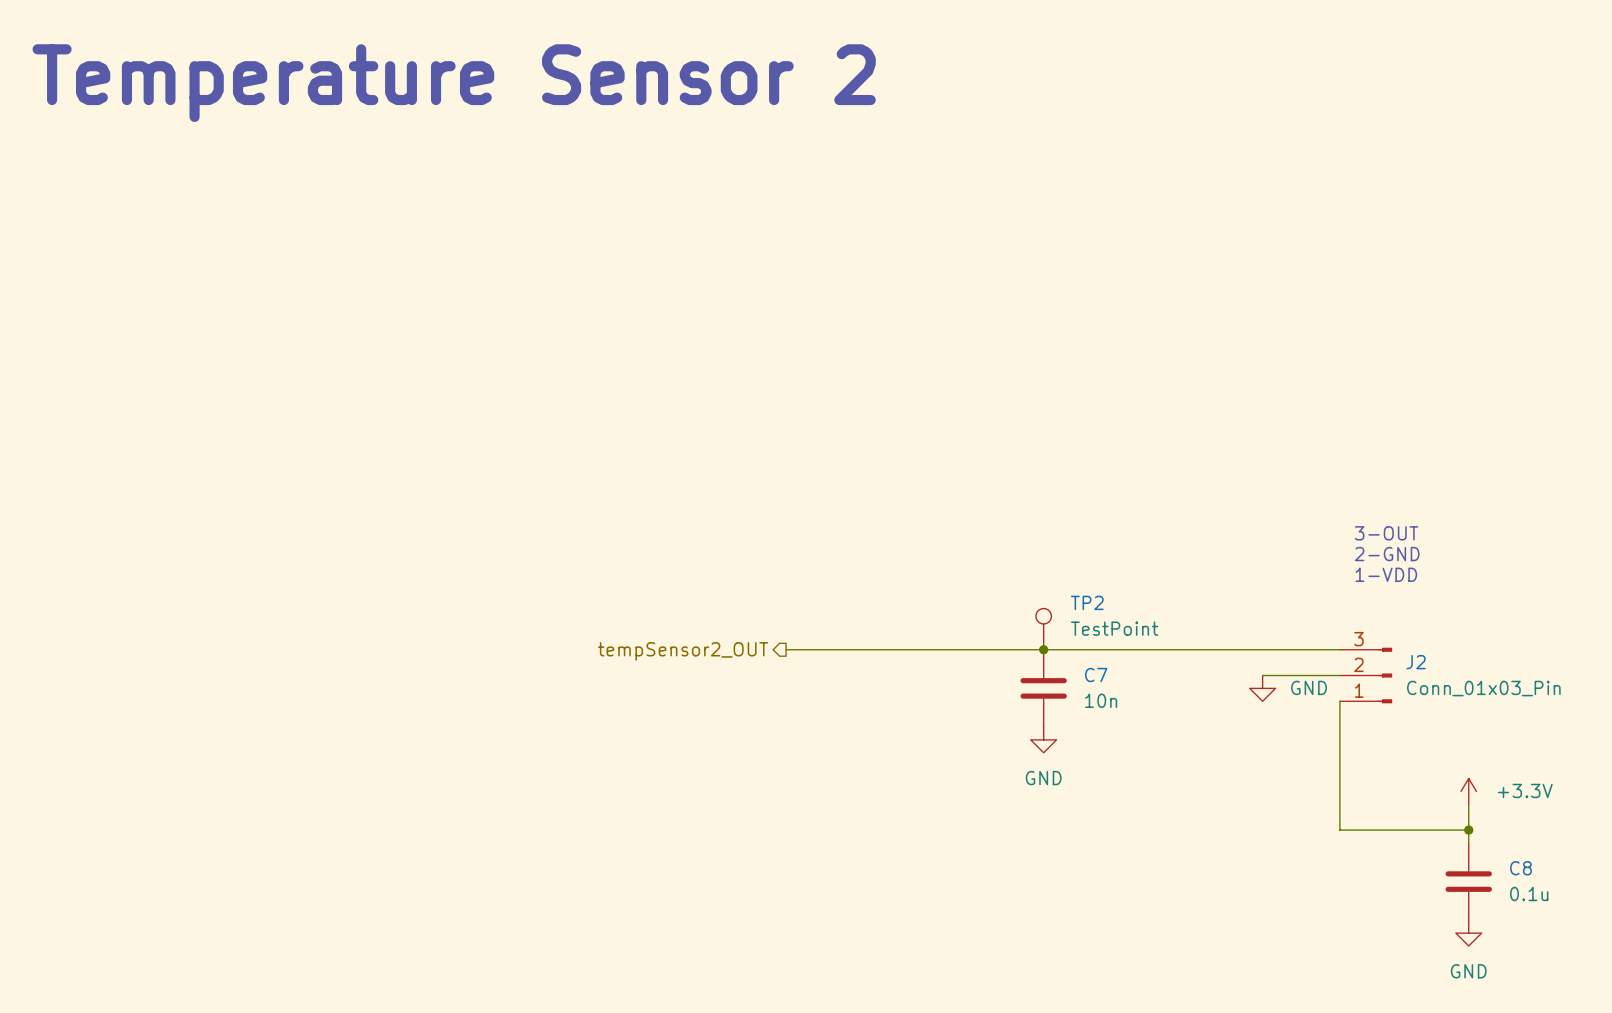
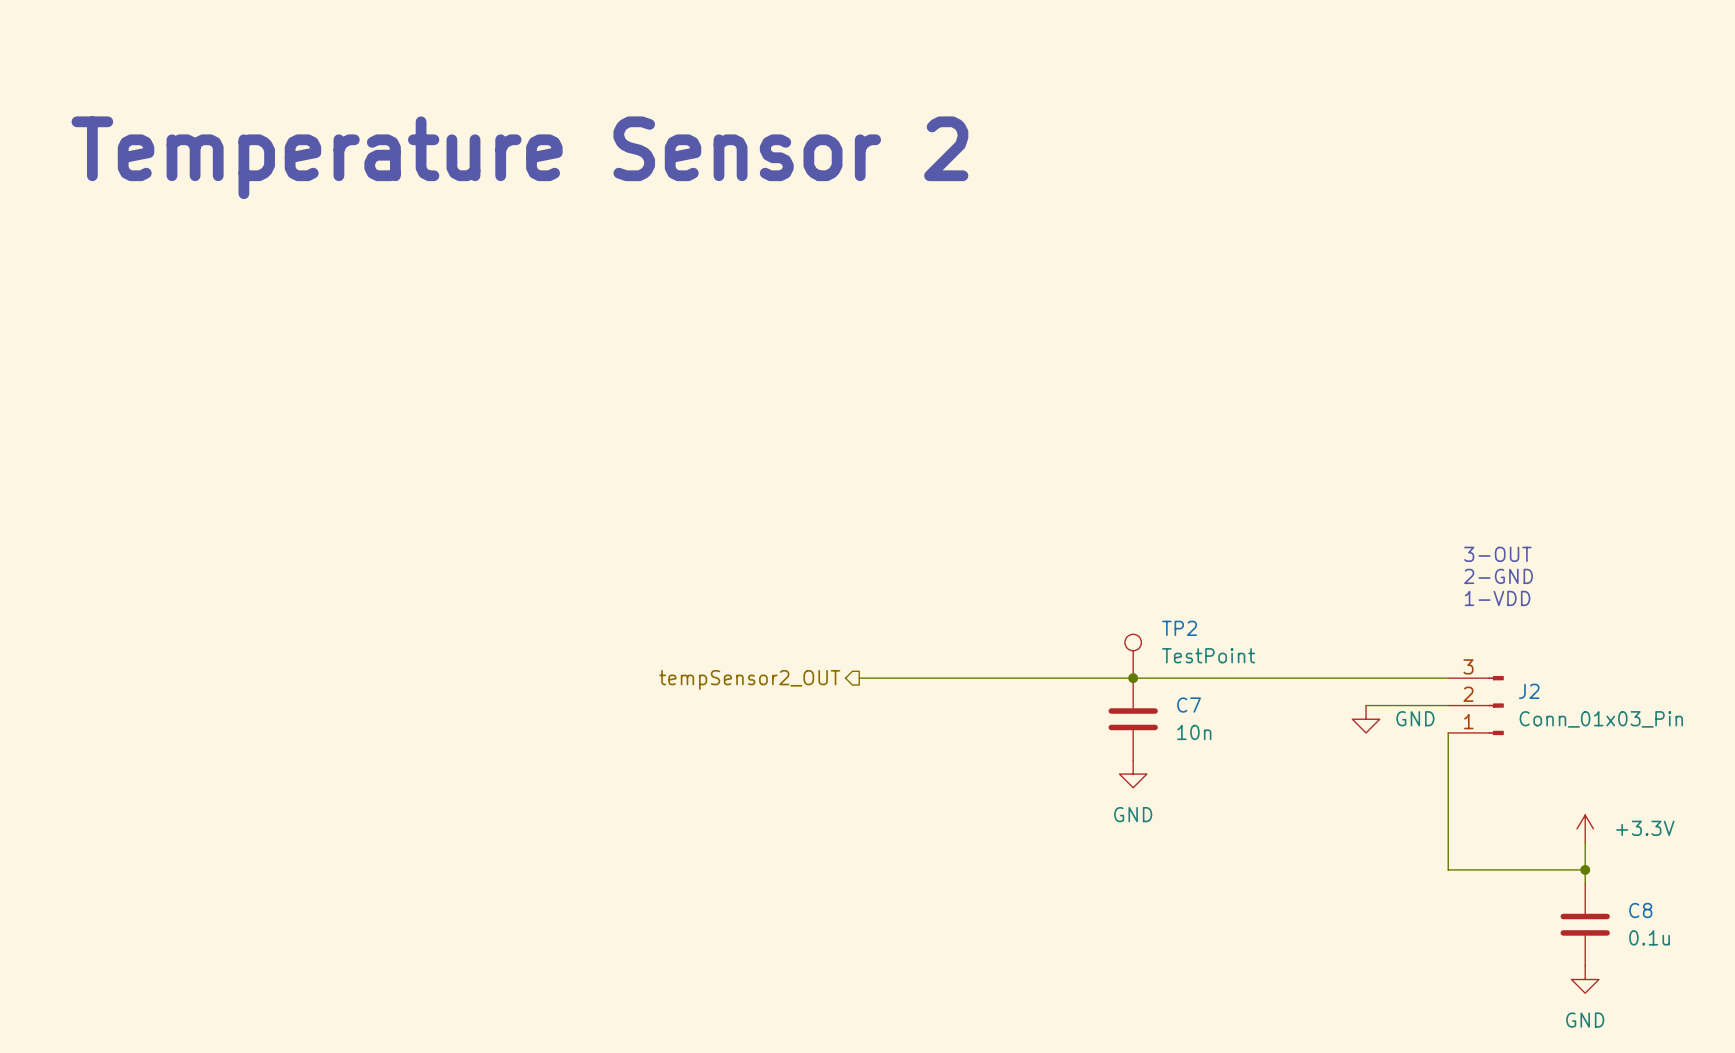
text position: Temperature Sensor 2 (454, 83) -> Temperature Sensor 2 (519, 157)

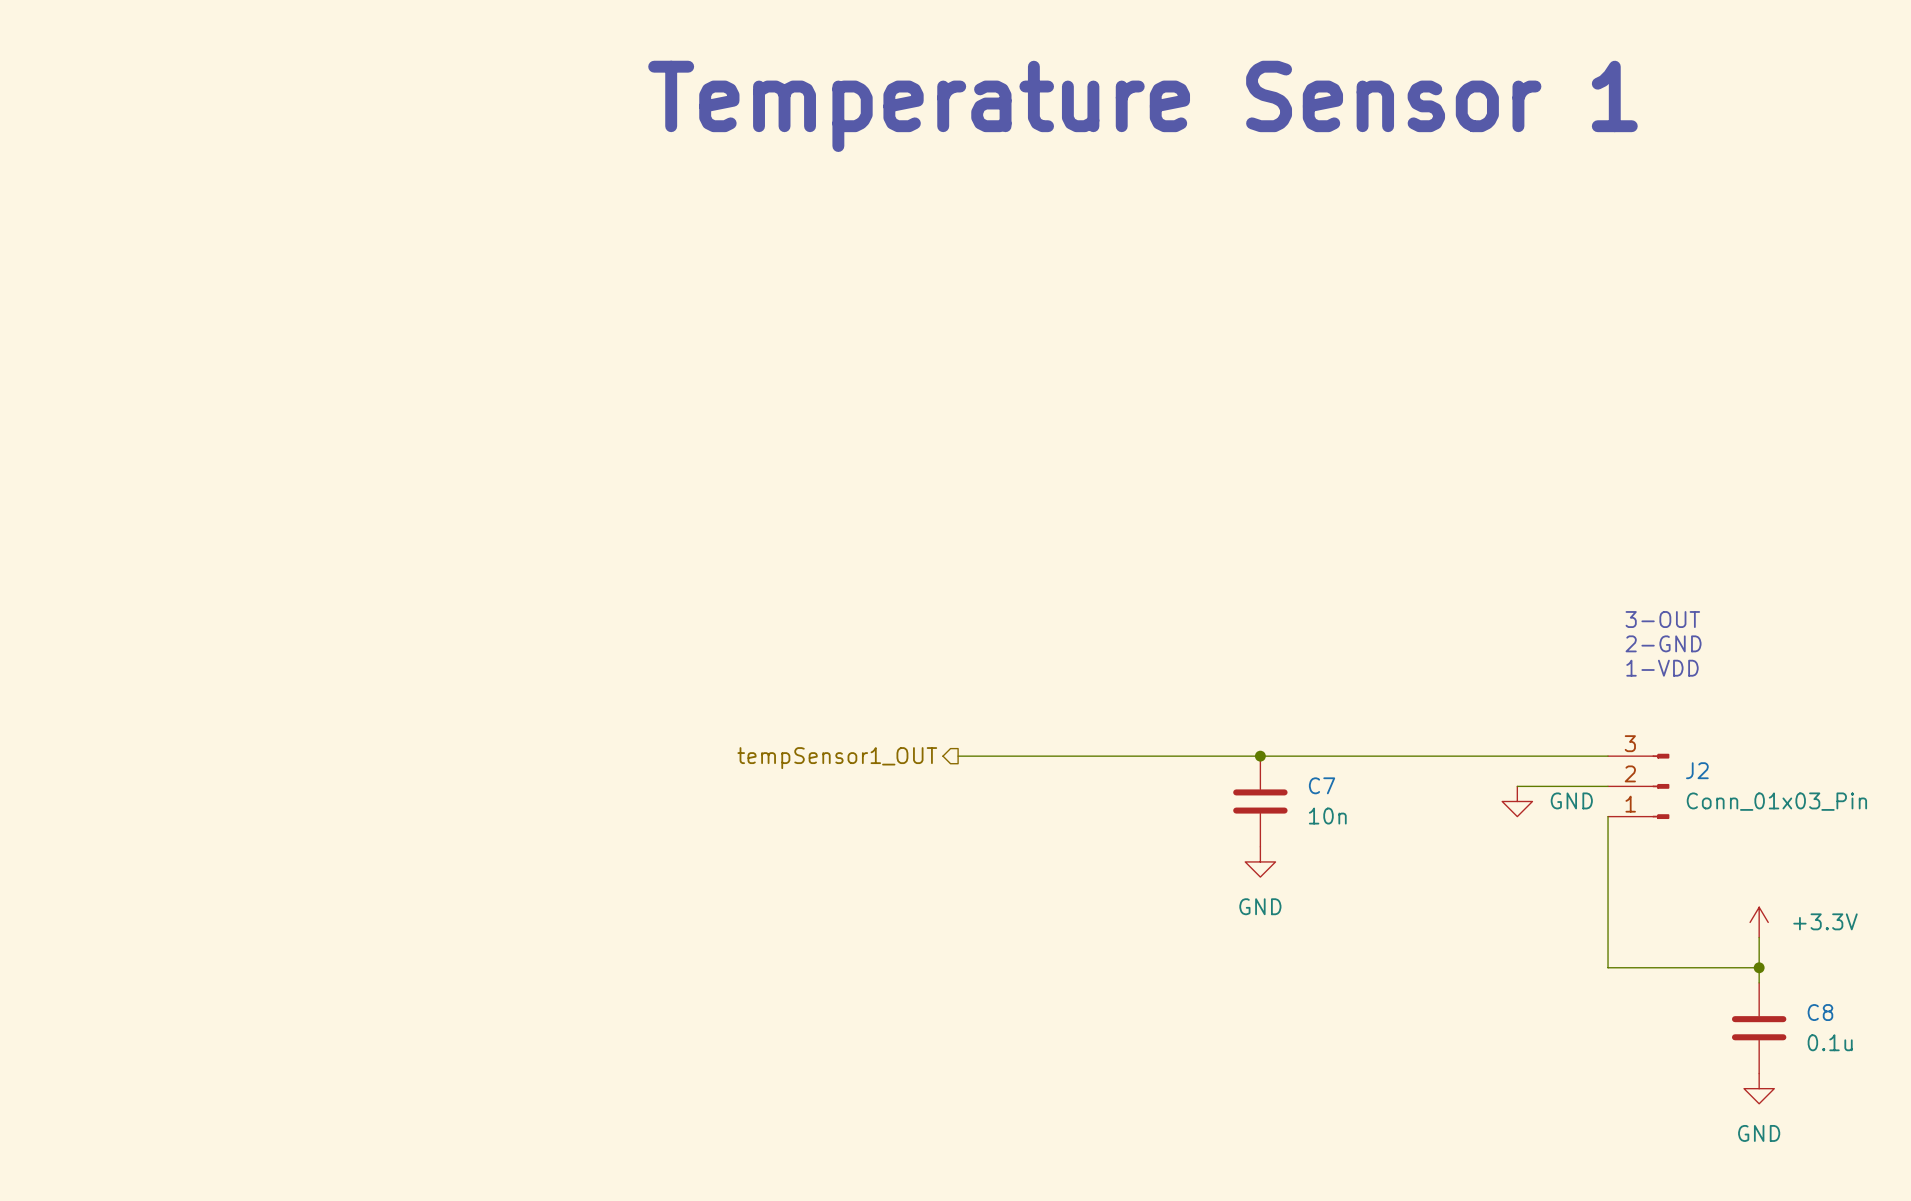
text: none -> Temperature Sensor 1 (1142, 106)
text: Temperature Sensor 2 (519, 157) -> none
TP2: TestPoint (1133, 656) -> none
hierarchical label: tempSensor2_OUT (749, 679) -> tempSensor1_OUT (837, 758)

